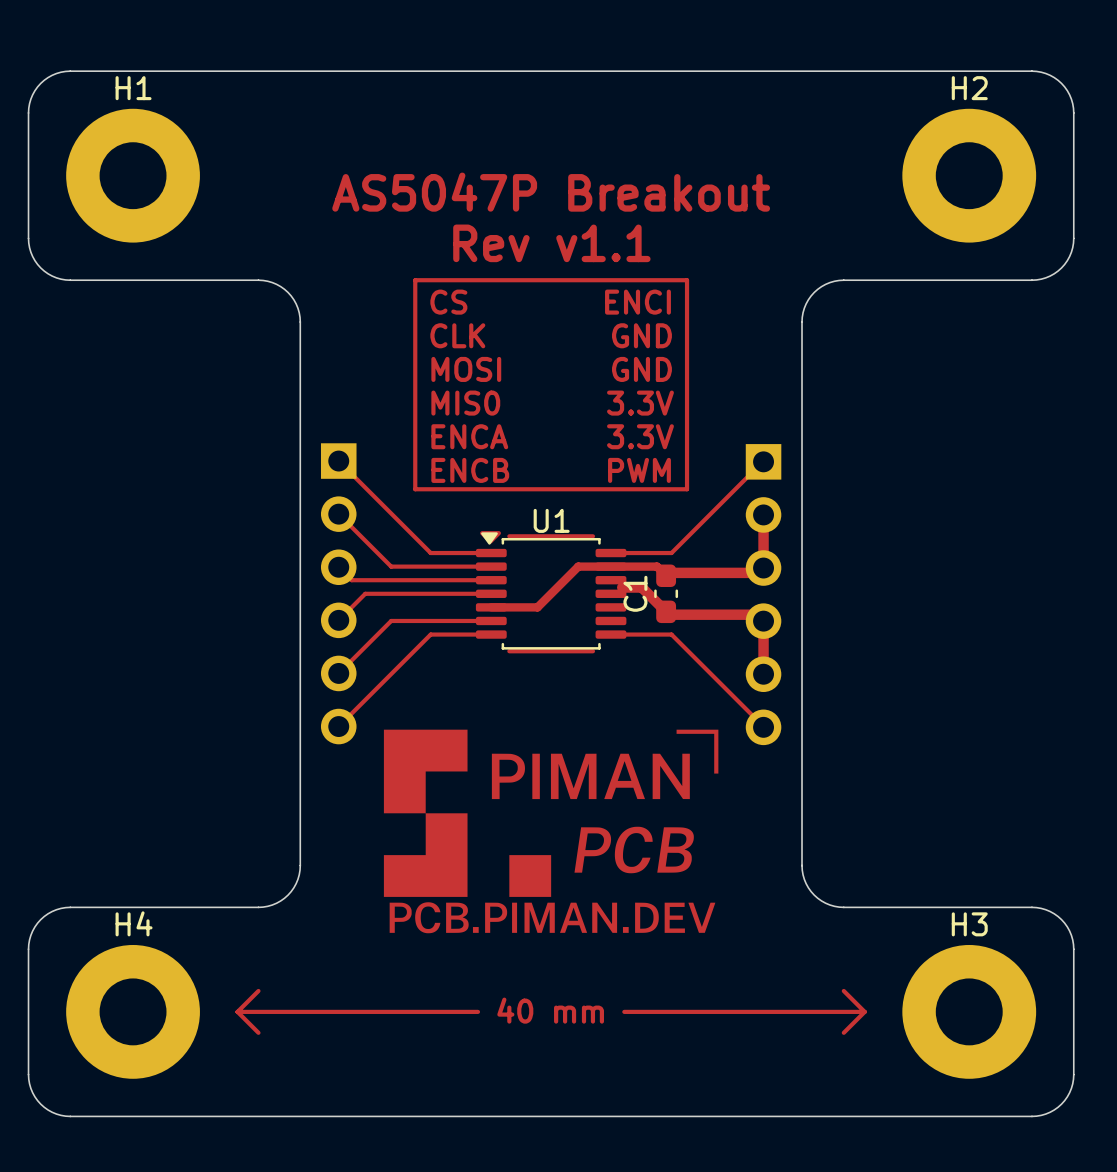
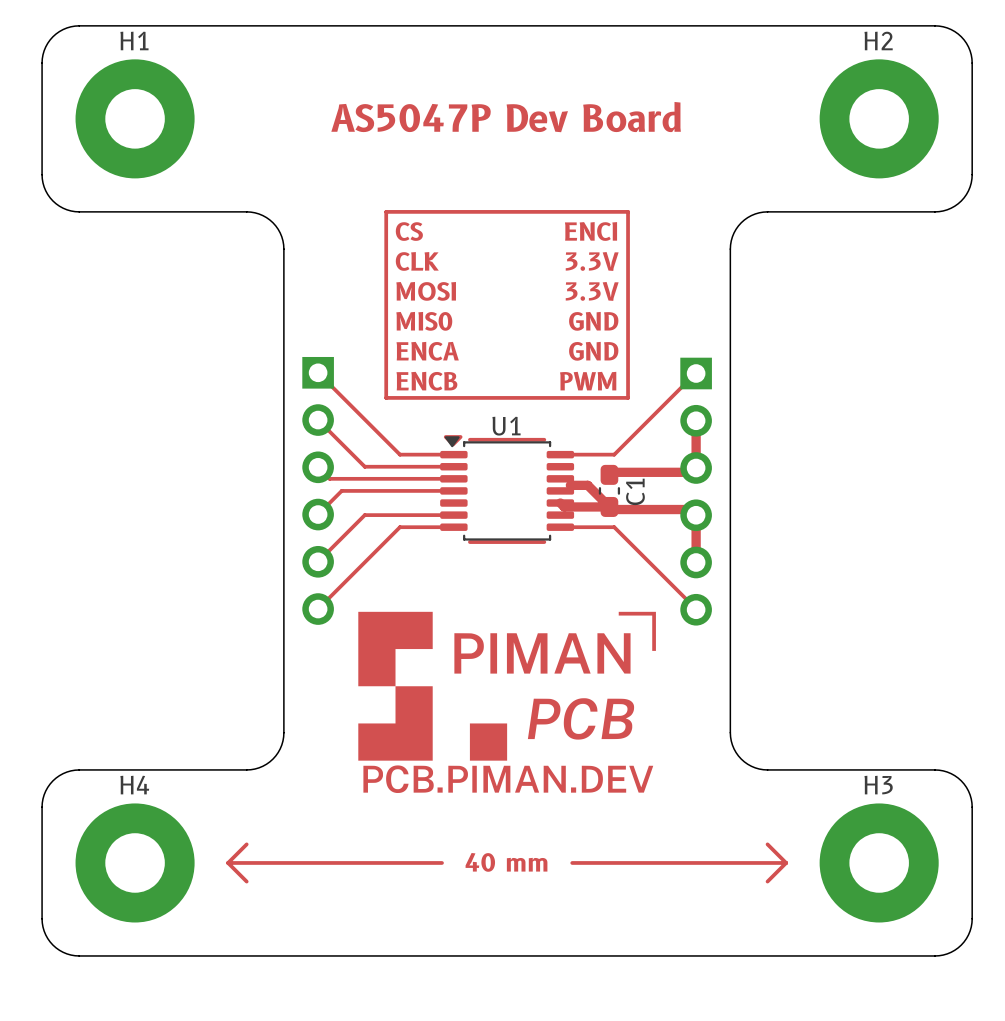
text: AS5047P Breakout (551, 192) -> AS5047P Dev Board (506, 117)
text: Rev v1.1 (551, 243) -> none
text: GND (641, 335) -> 3.3V (592, 261)
text: GND (641, 369) -> 3.3V (592, 291)
text: 3.3V (640, 403) -> GND (593, 321)
text: 3.3V (640, 436) -> GND (593, 351)
track: (666, 575) (656, 566) (578, 566) (537, 607) (491, 607) -> none
C1 name position: C1 (635, 593) -> C1 (635, 491)
track: none -> (560, 503) (564, 506) (609, 506)

